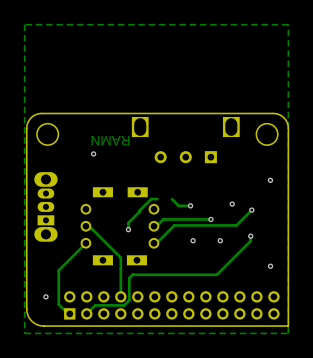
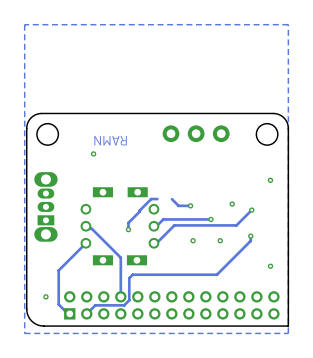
part: none -> (196, 133)
part: (185, 140) -> none

